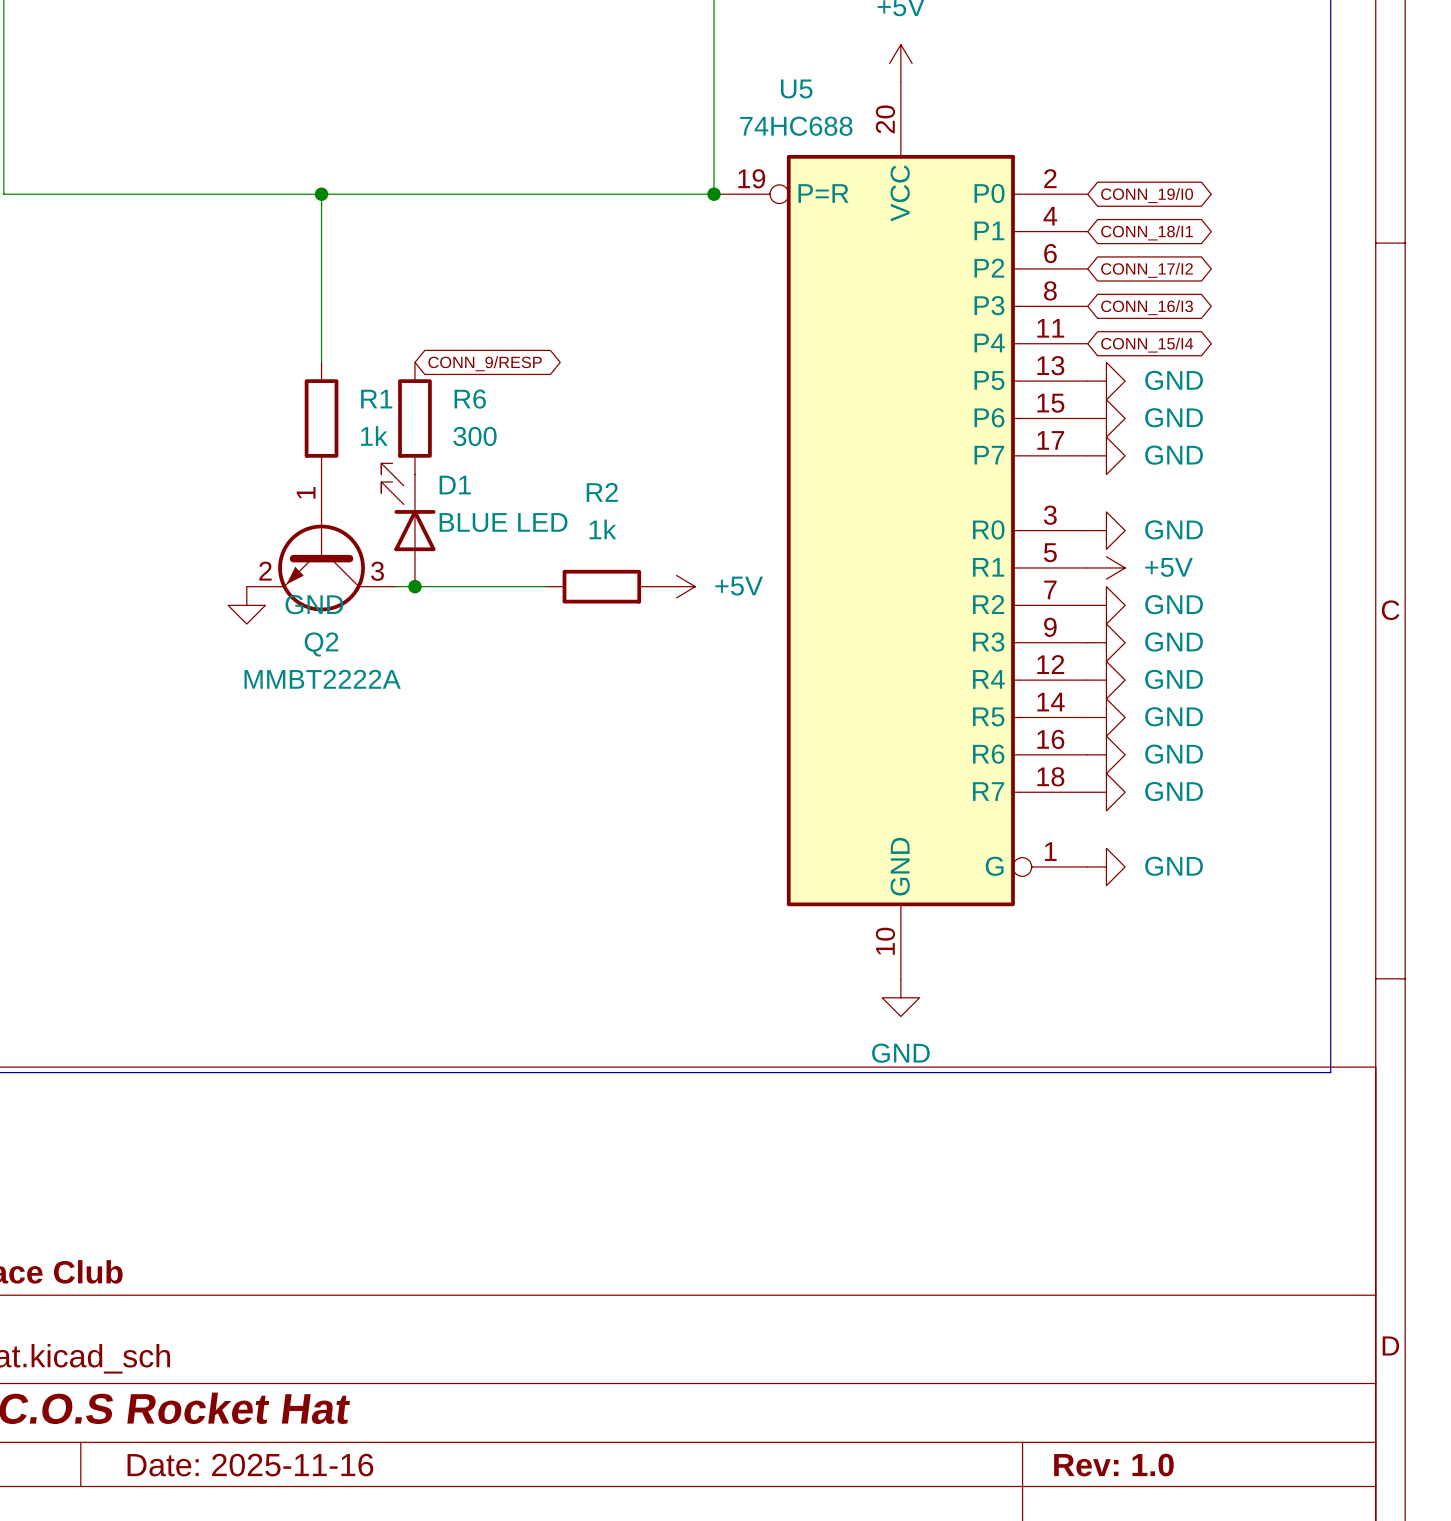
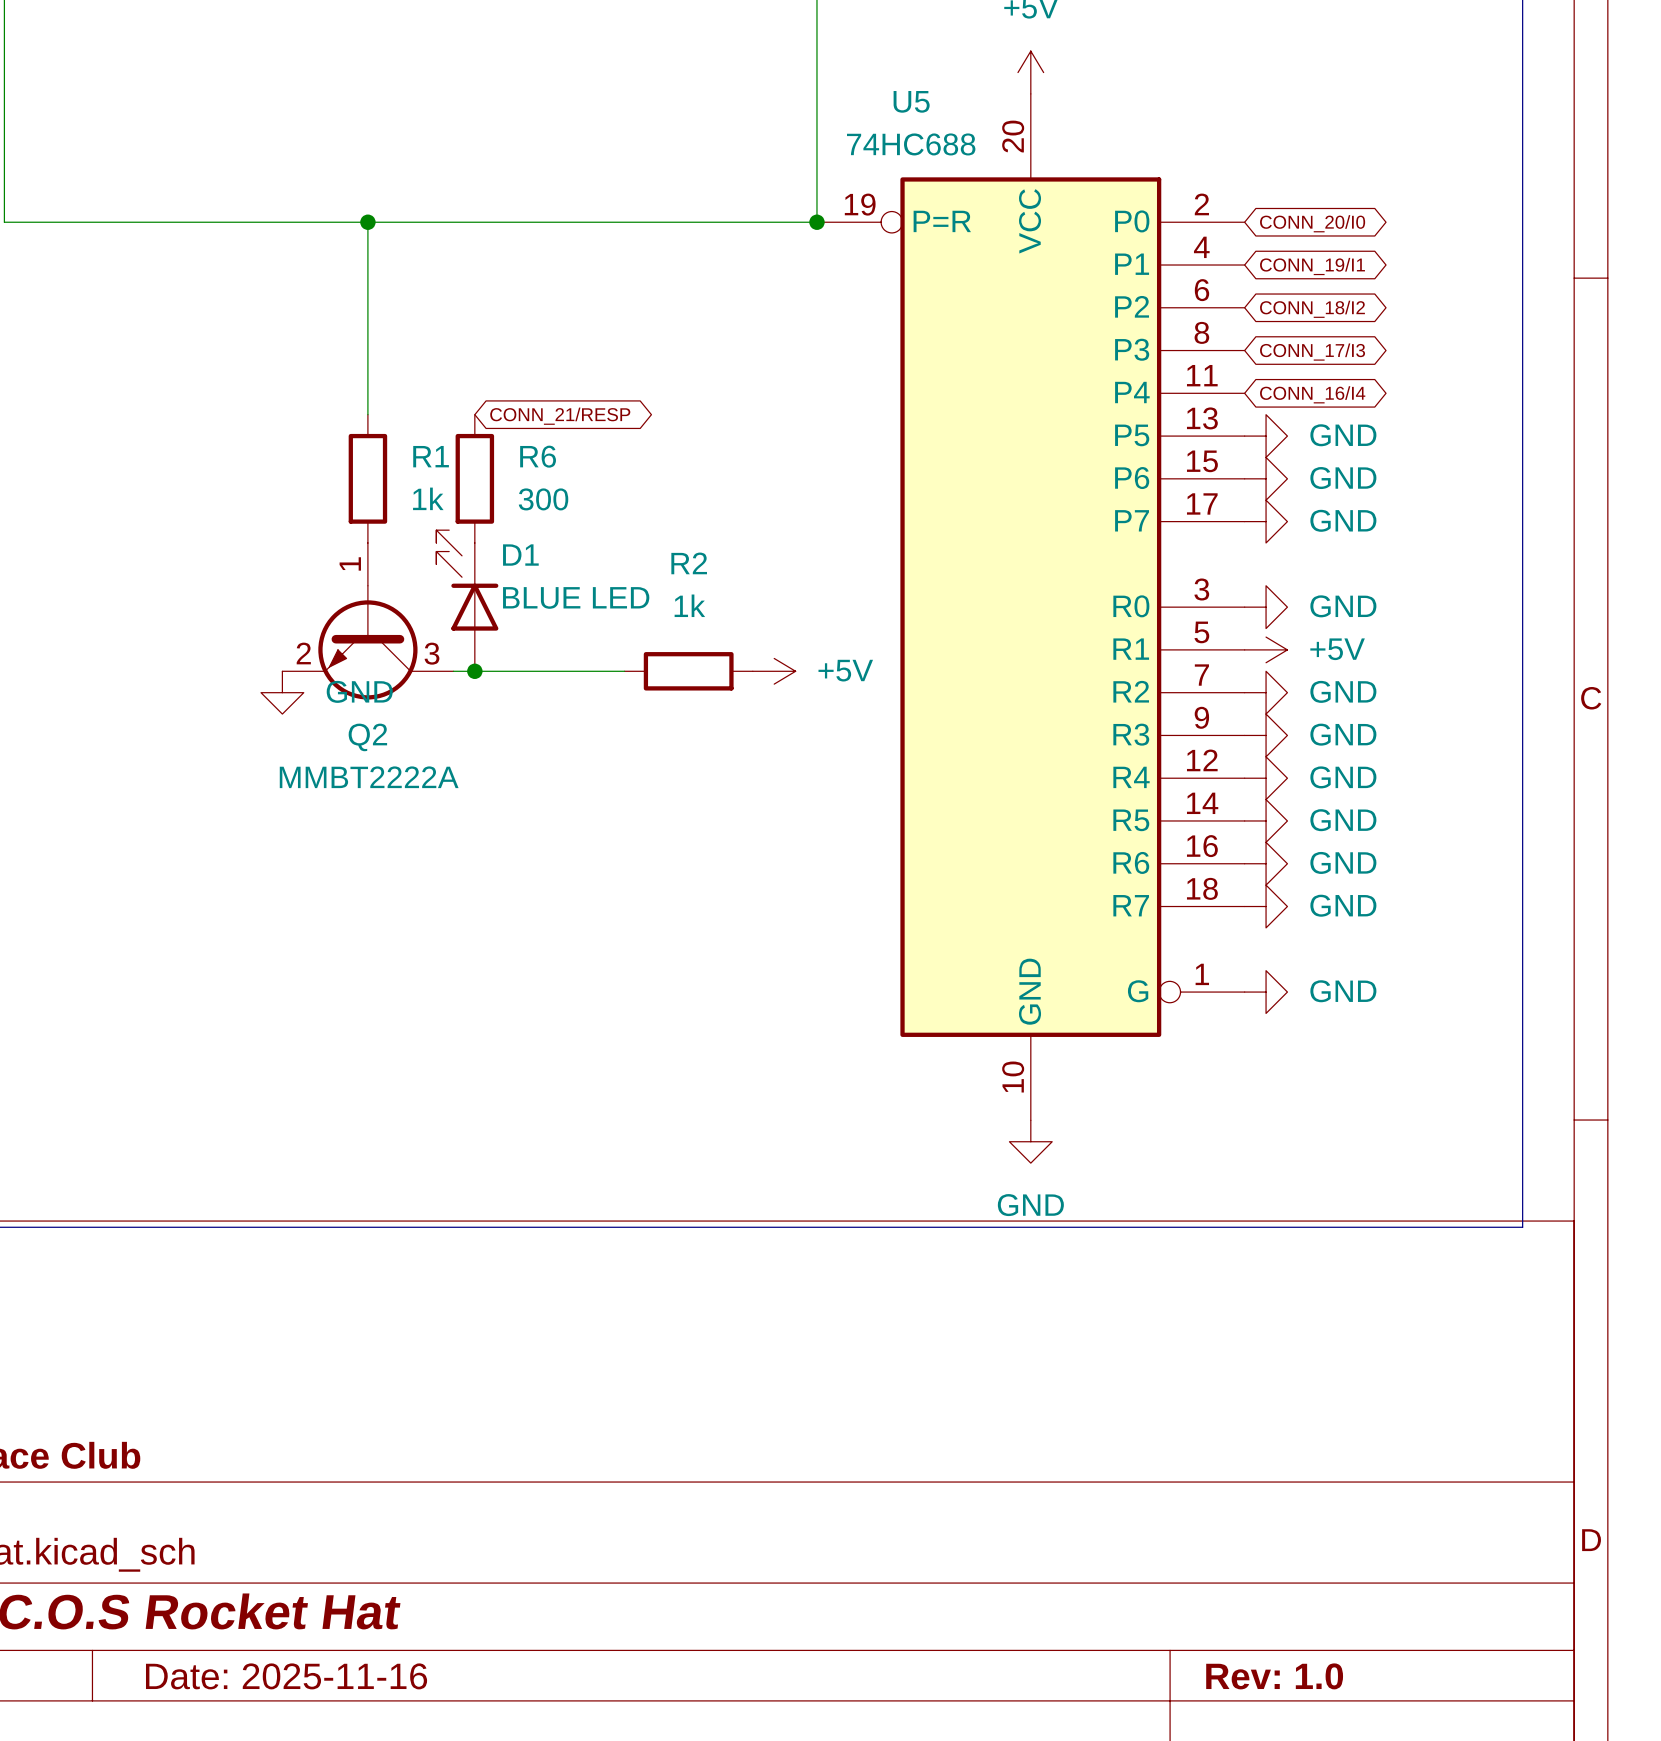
global label: CONN_19/I0 (1147, 195) -> CONN_20/I0 (1312, 223)
global label: CONN_18/I1 (1147, 232) -> CONN_19/I1 (1312, 266)
global label: CONN_17/I2 (1147, 270) -> CONN_18/I2 (1312, 309)
global label: CONN_16/I3 (1147, 307) -> CONN_17/I3 (1312, 352)
global label: CONN_15/I4 (1147, 345) -> CONN_16/I4 (1312, 394)
global label: CONN_9/RESP (485, 363) -> CONN_21/RESP (560, 416)

